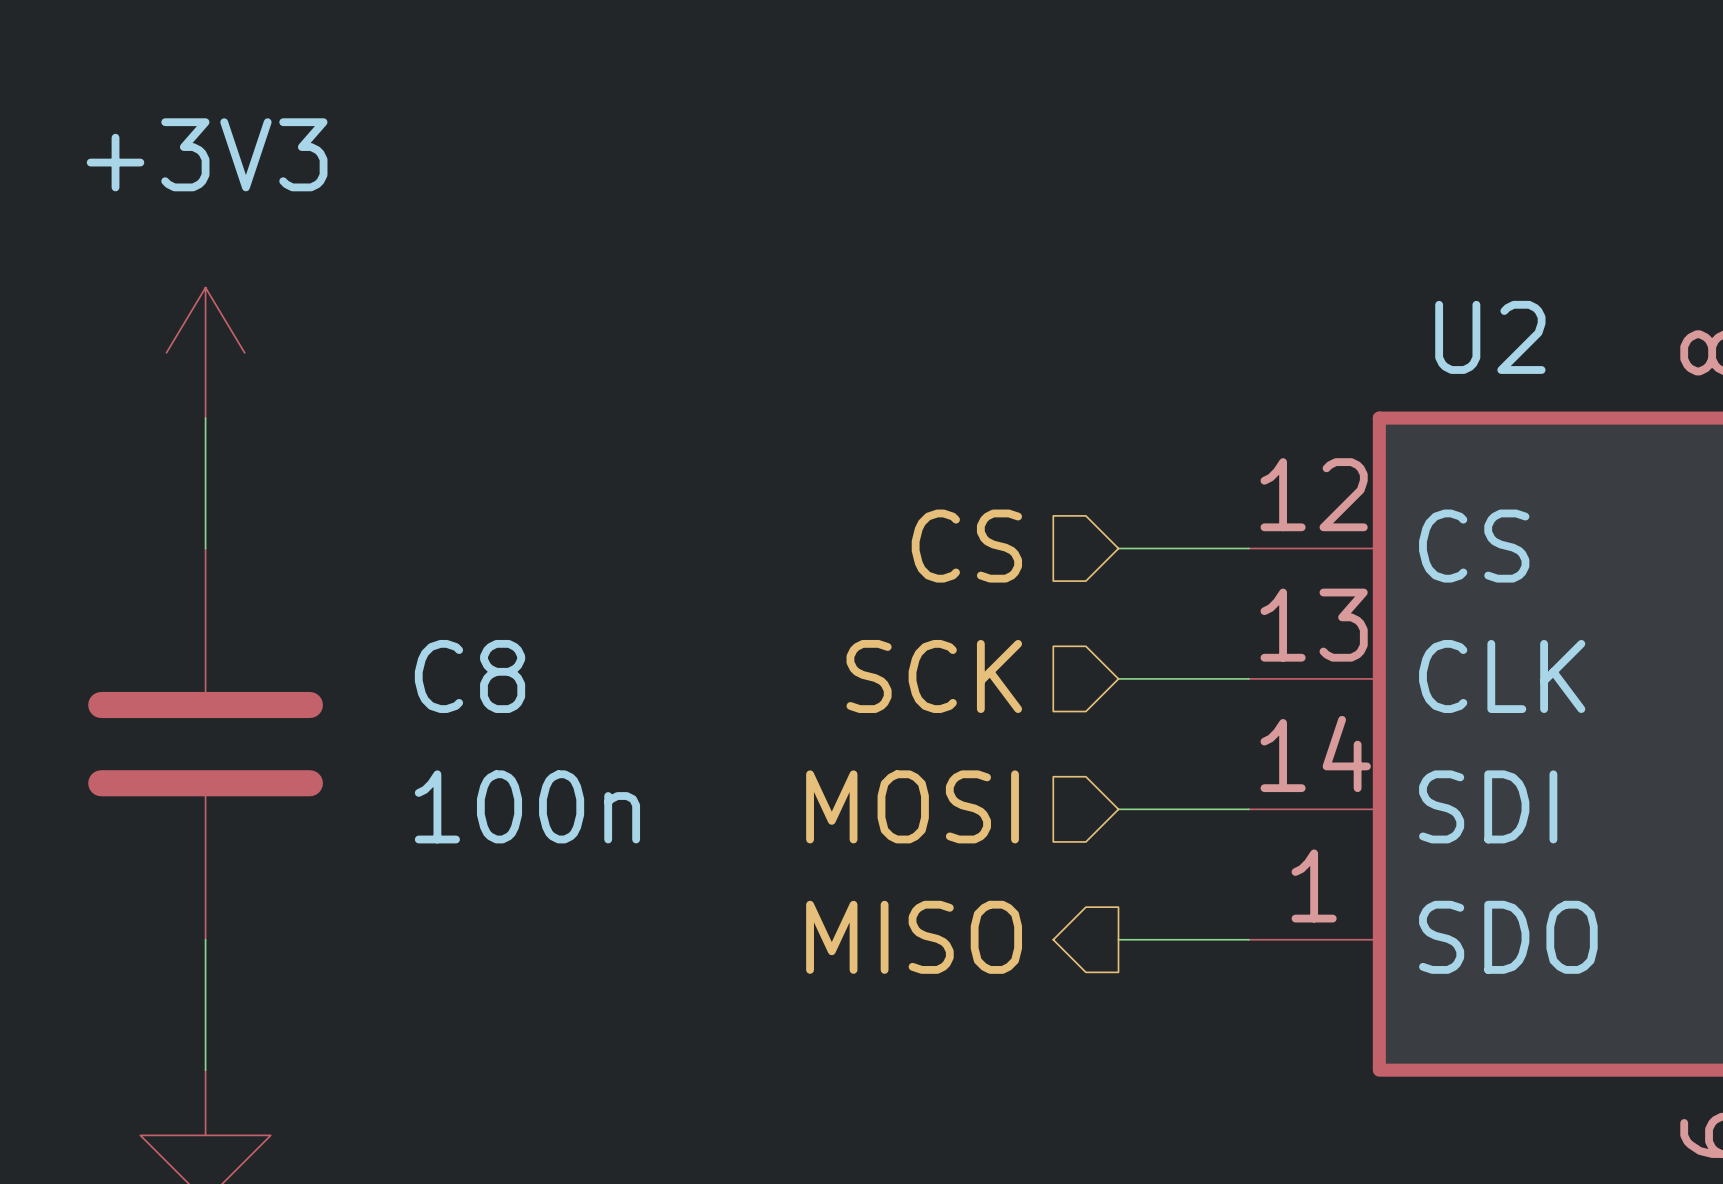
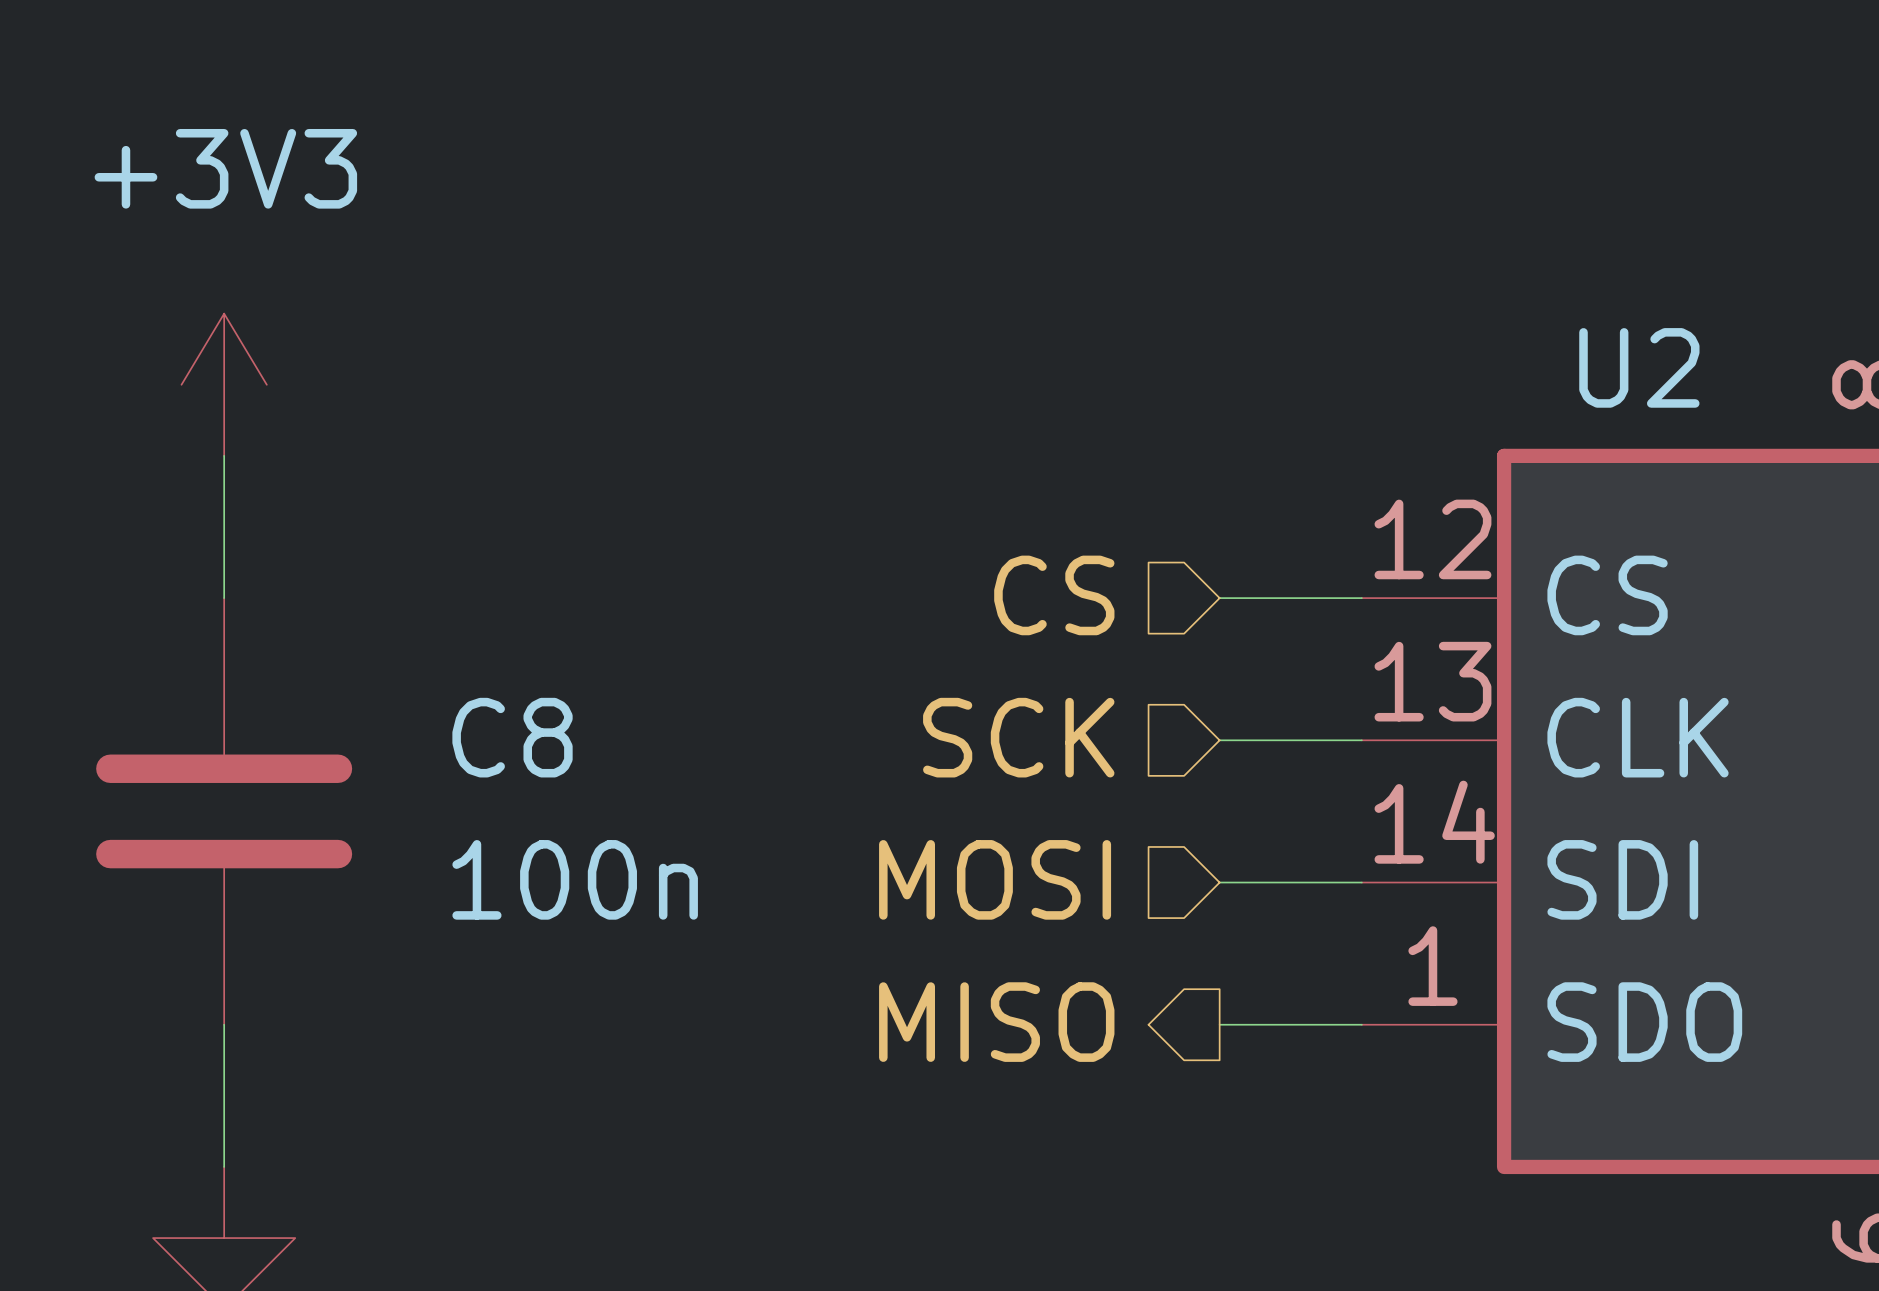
U2 name position: U2 (1490, 337) -> U2 (1639, 367)

